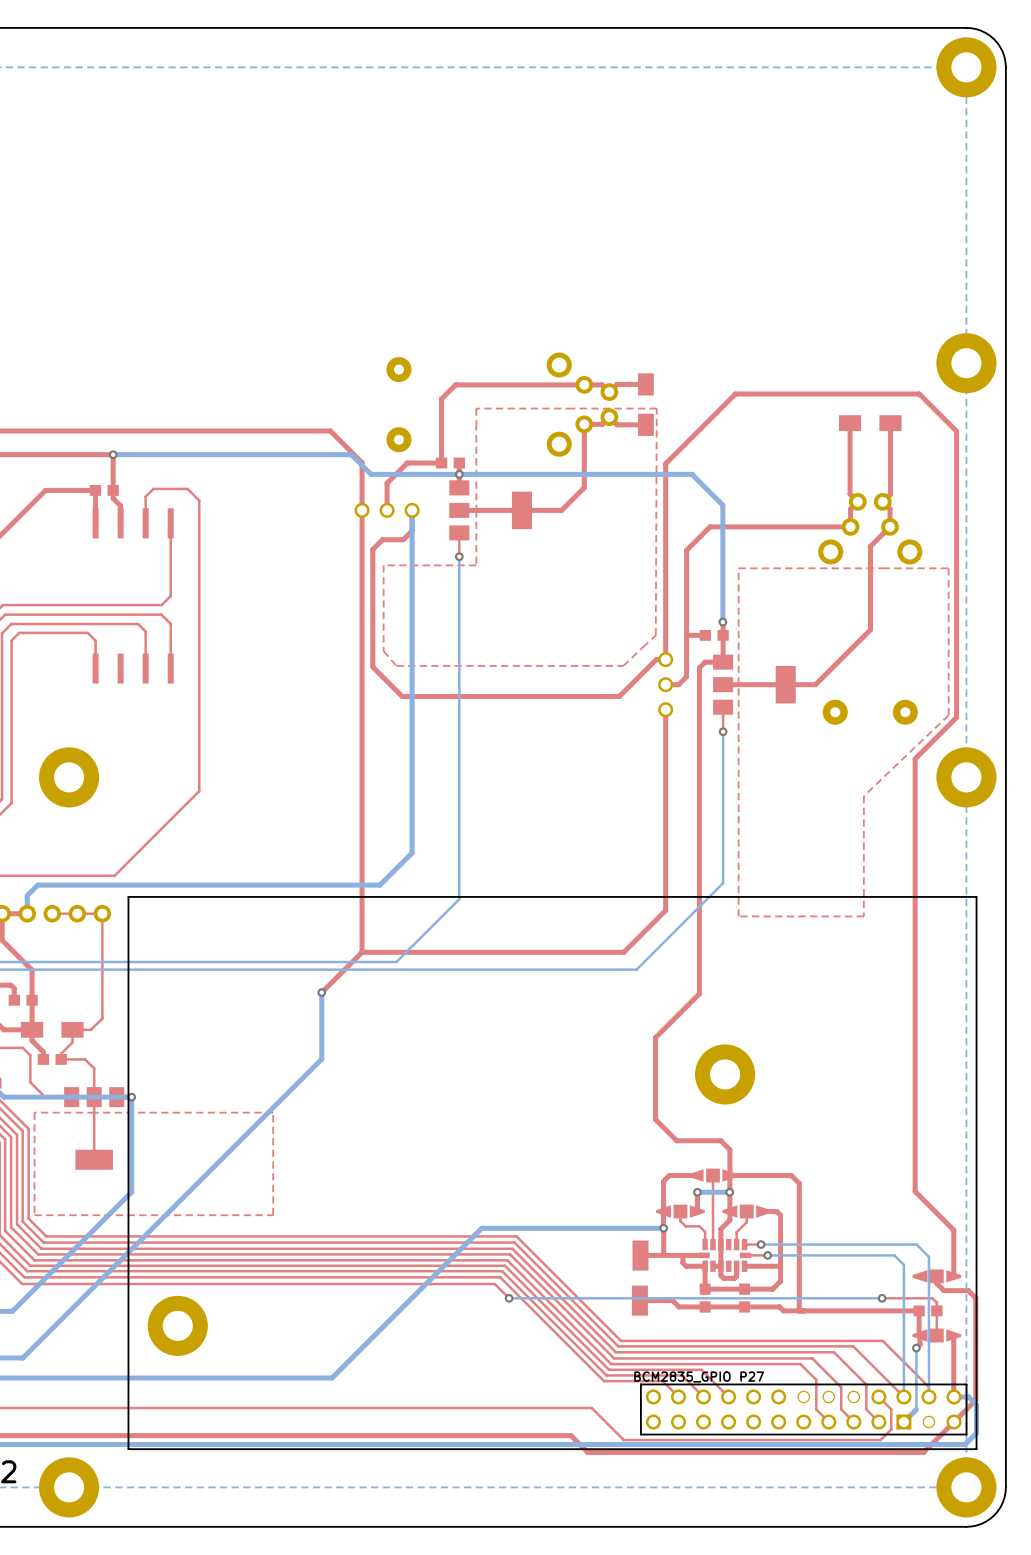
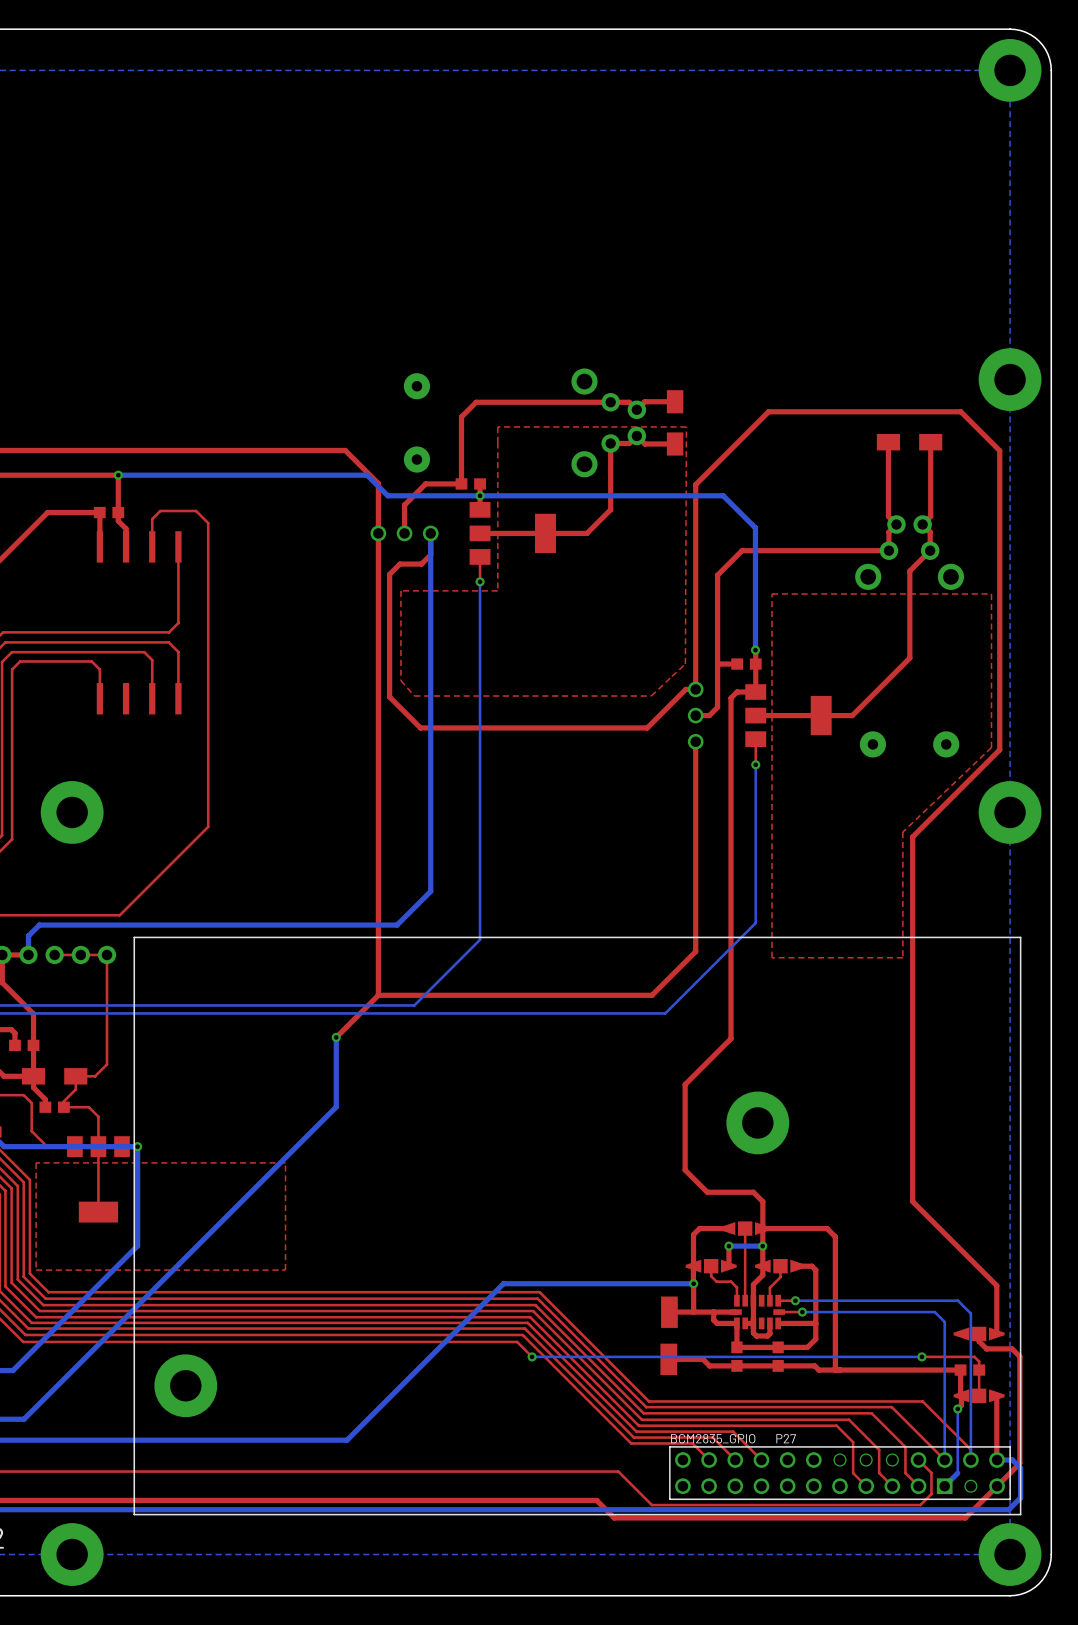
top track: (915, 758) (915, 1191) -> (956, 793) (912, 836) (912, 1201) (956, 1245)

